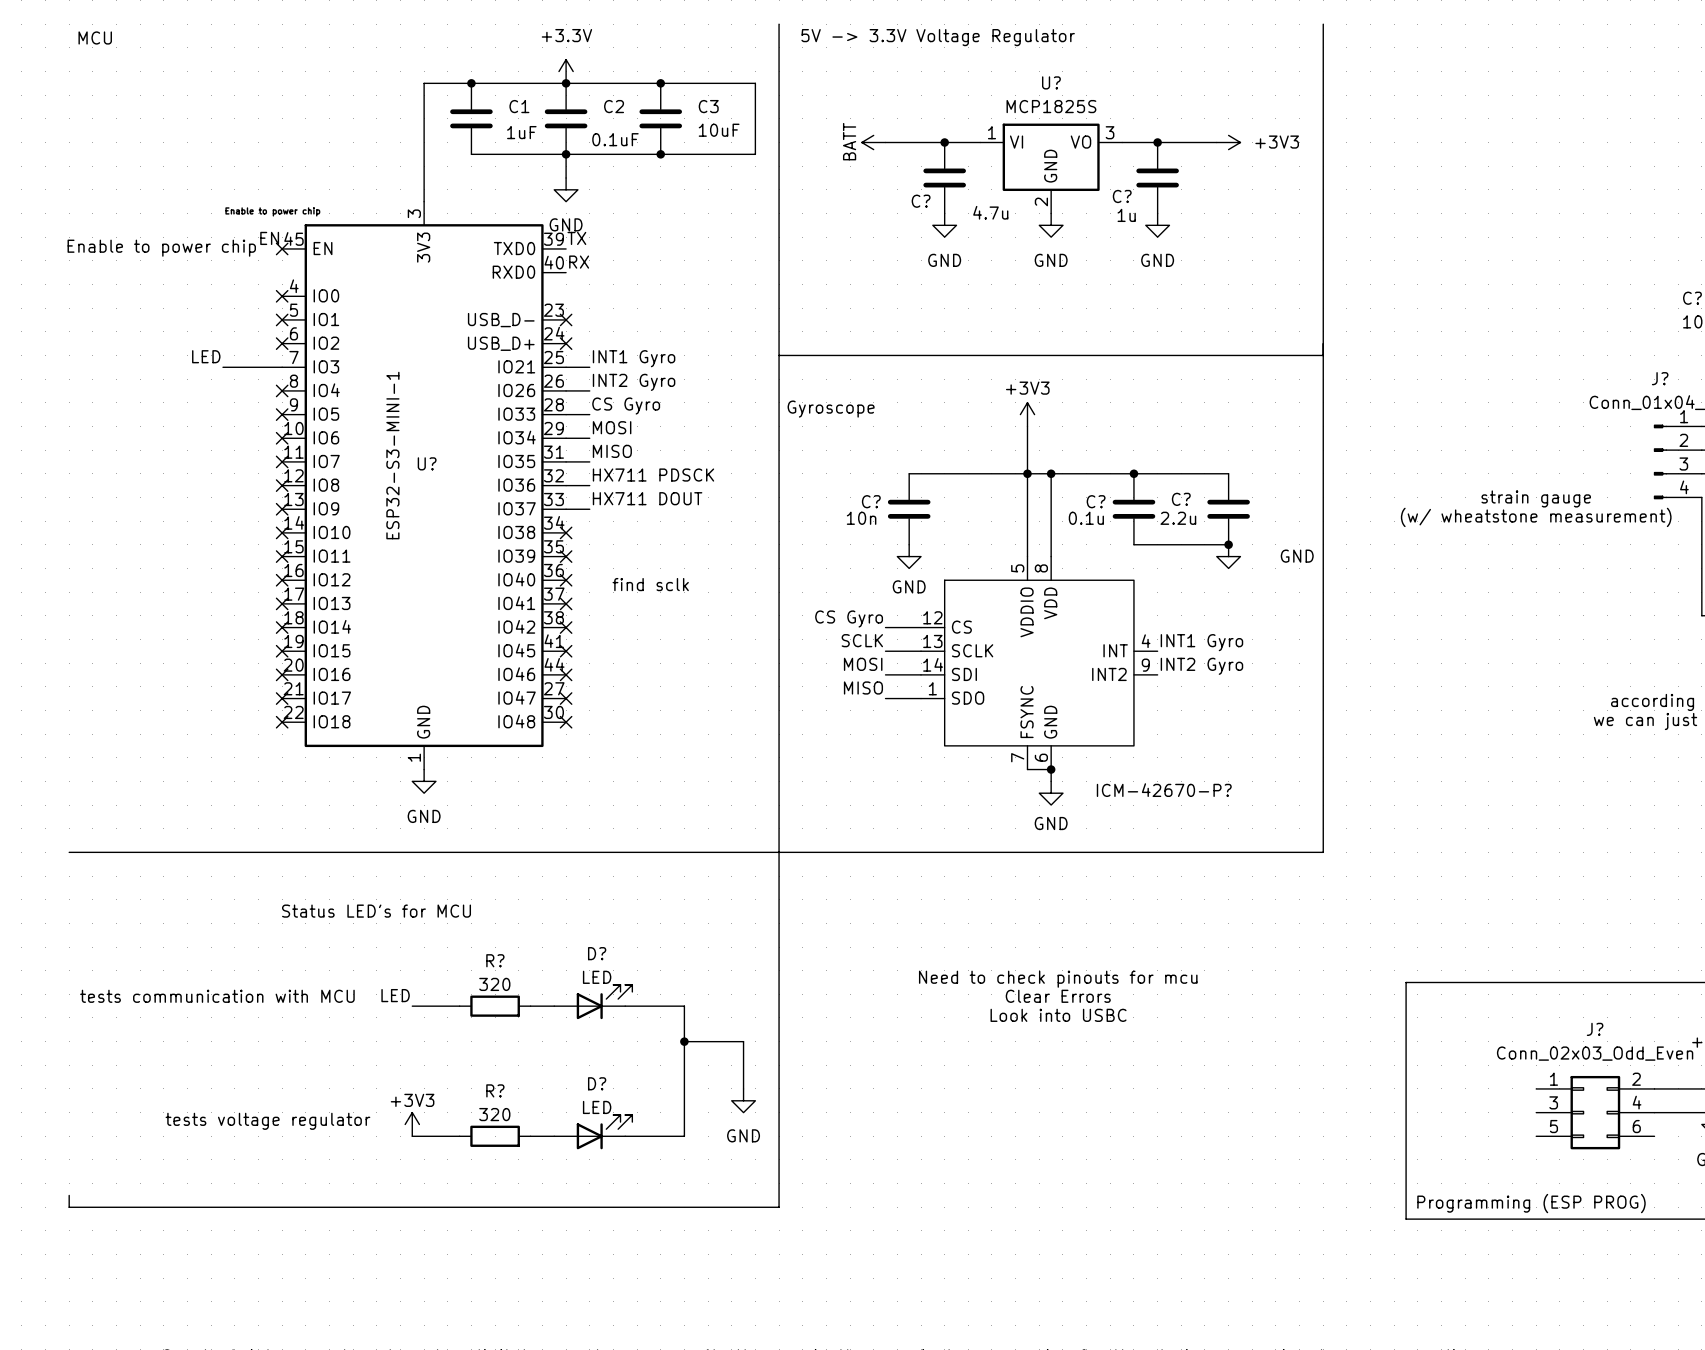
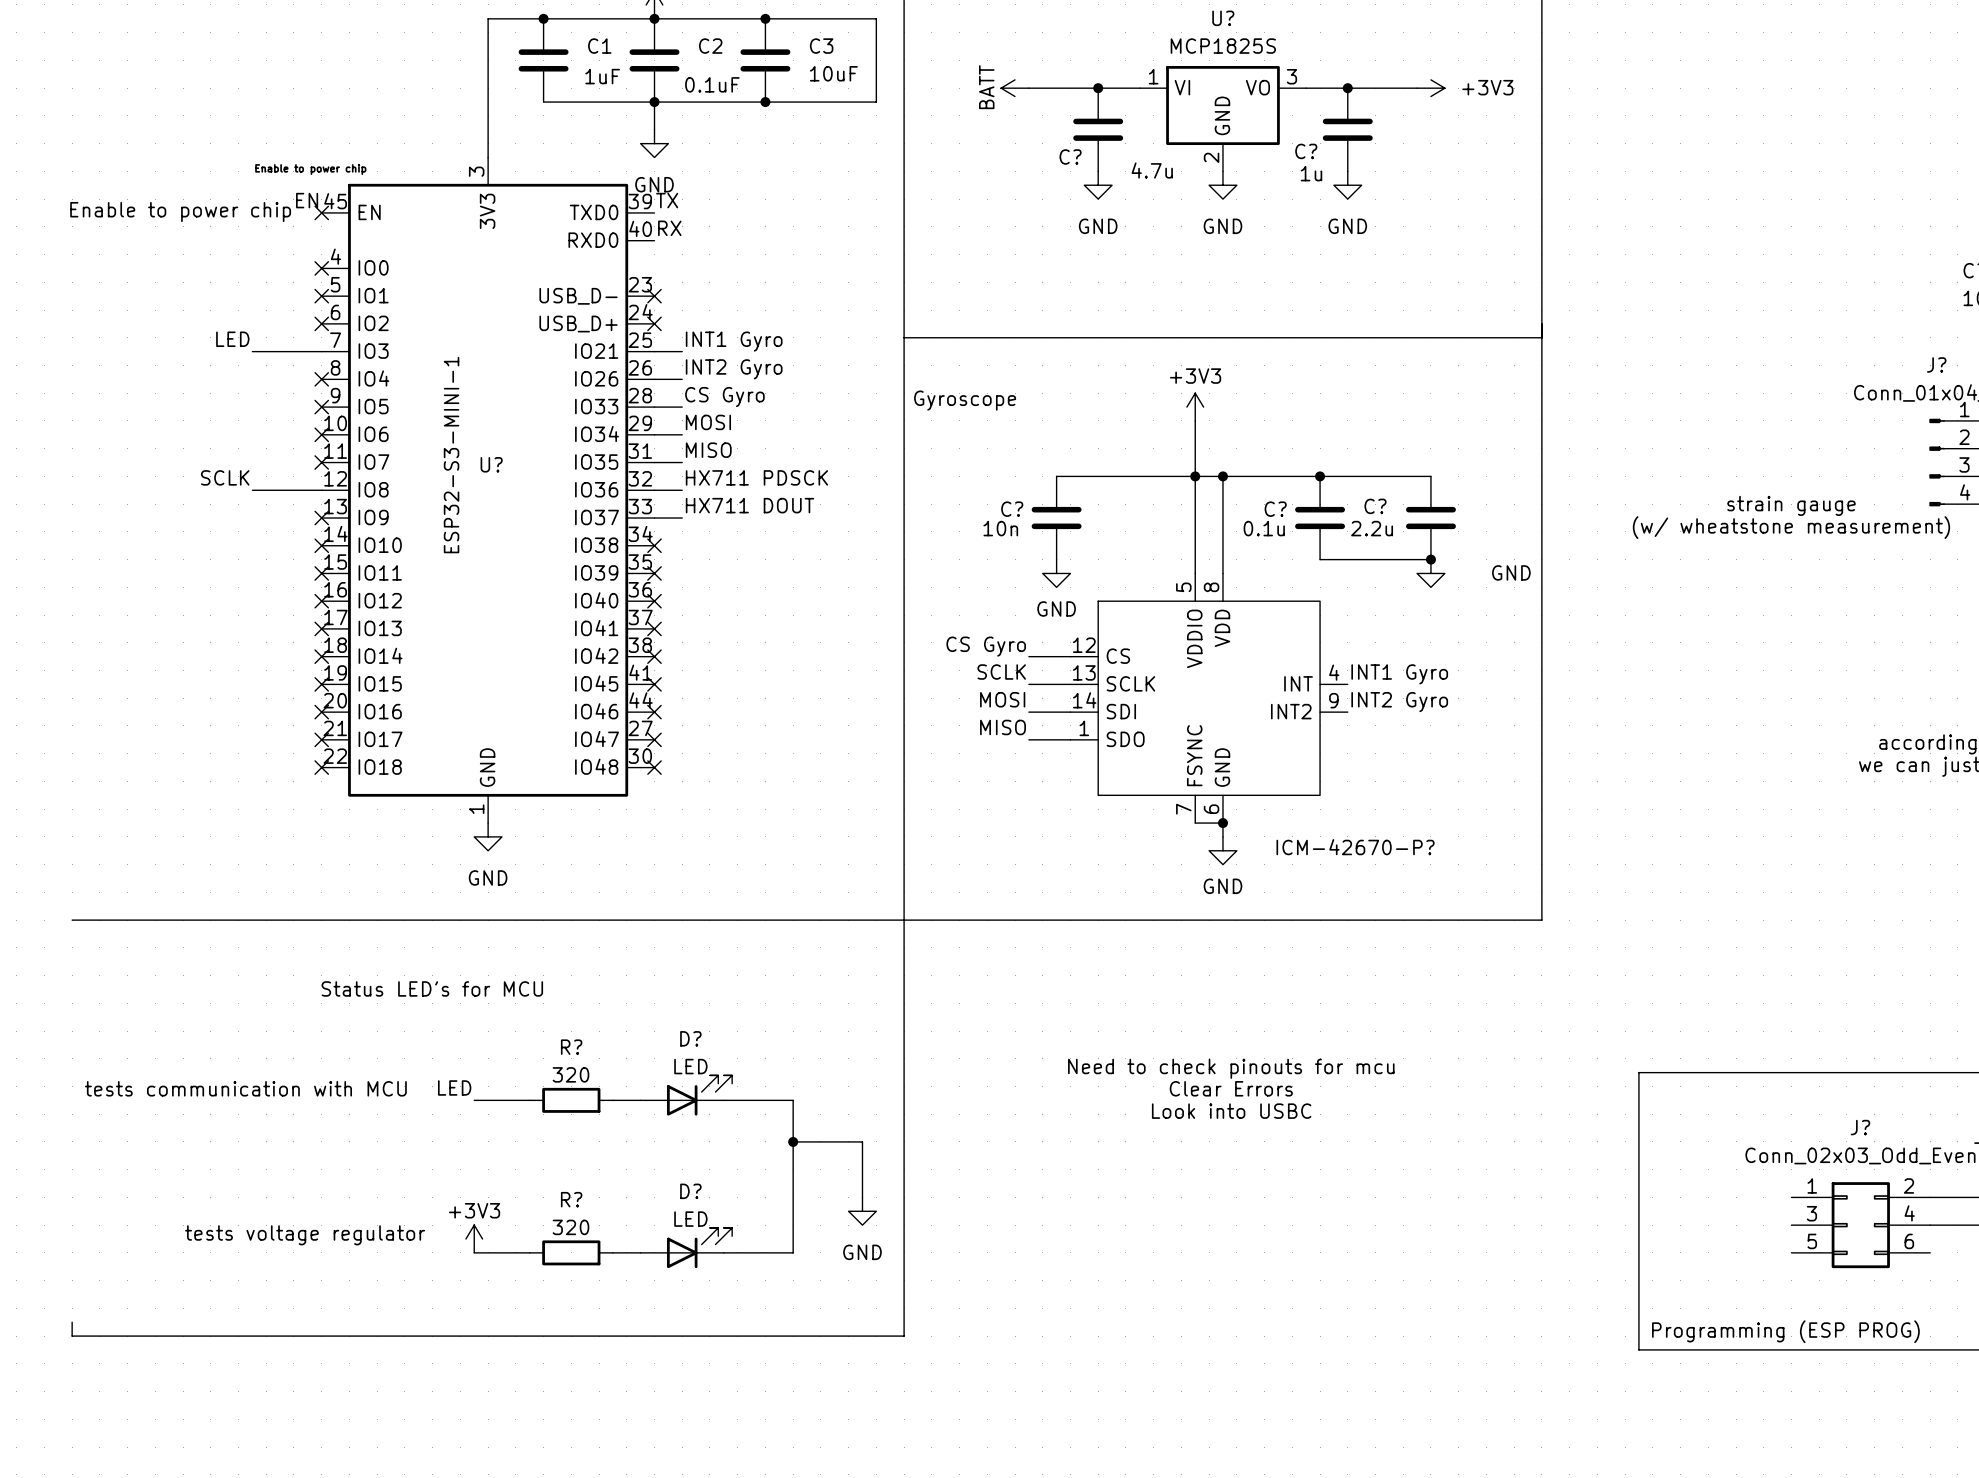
label: none -> SCLK (225, 477)
wire: none -> (252, 490) (321, 490)
no-connect mark: (282, 485) -> none
text: find sclk (650, 584) -> none

